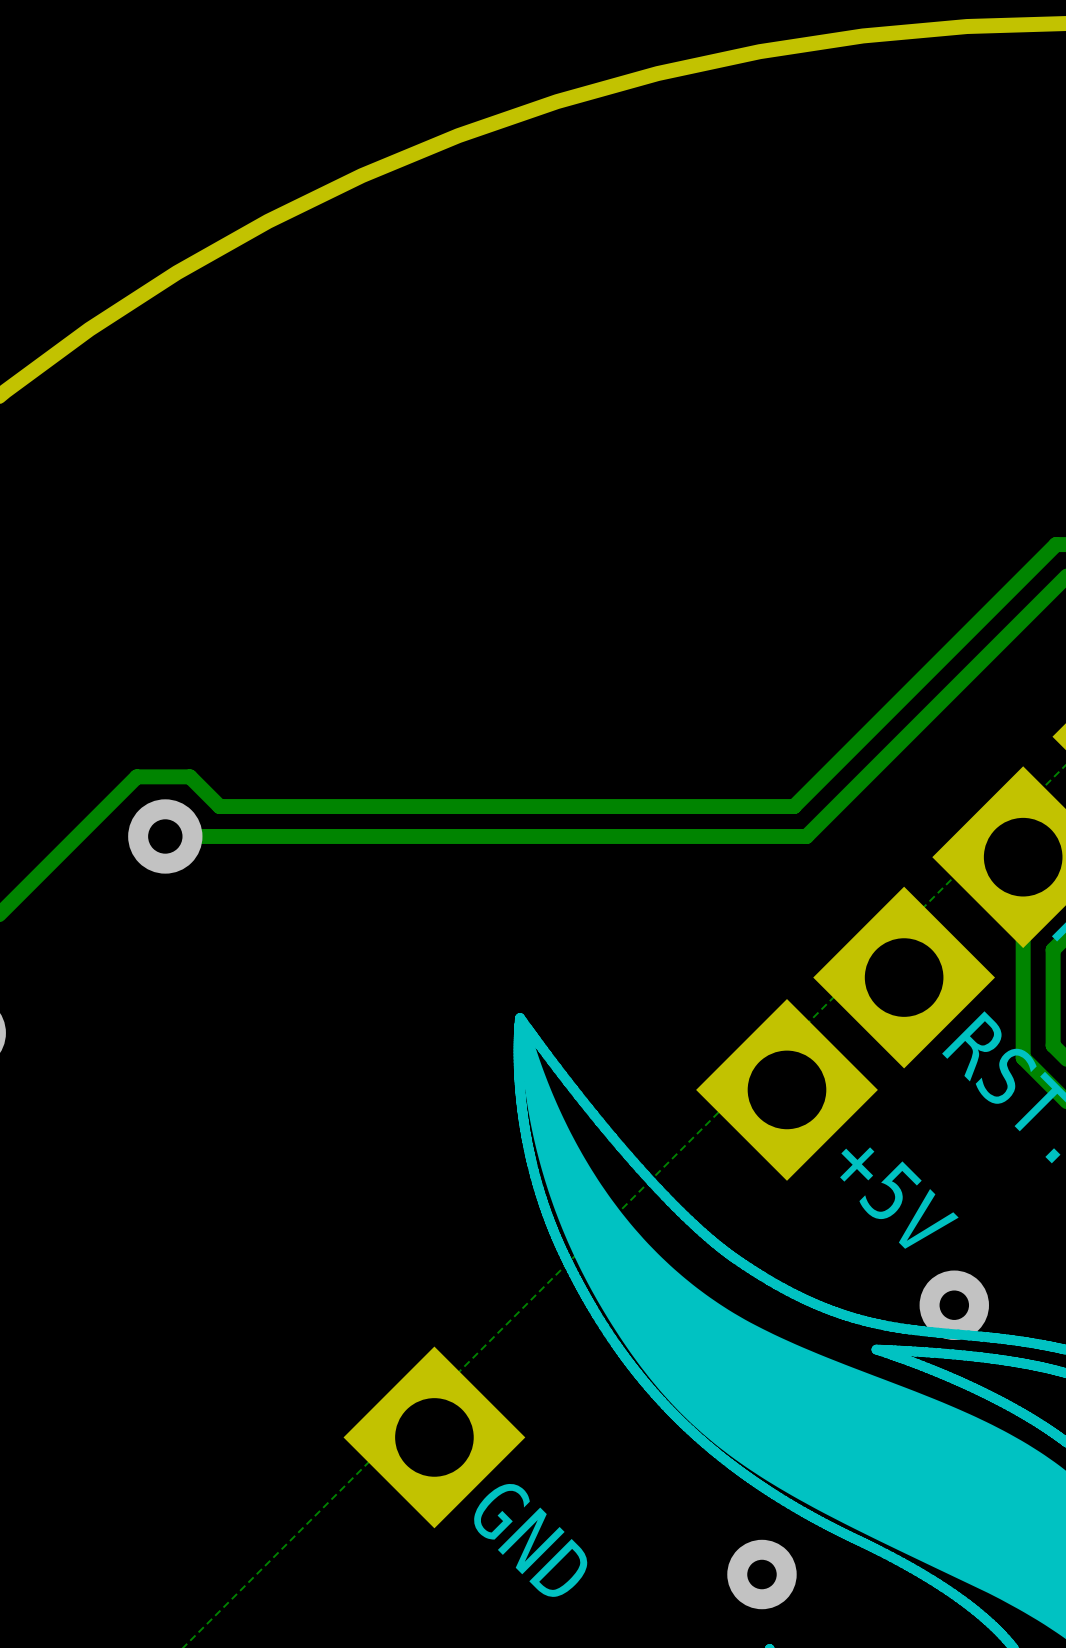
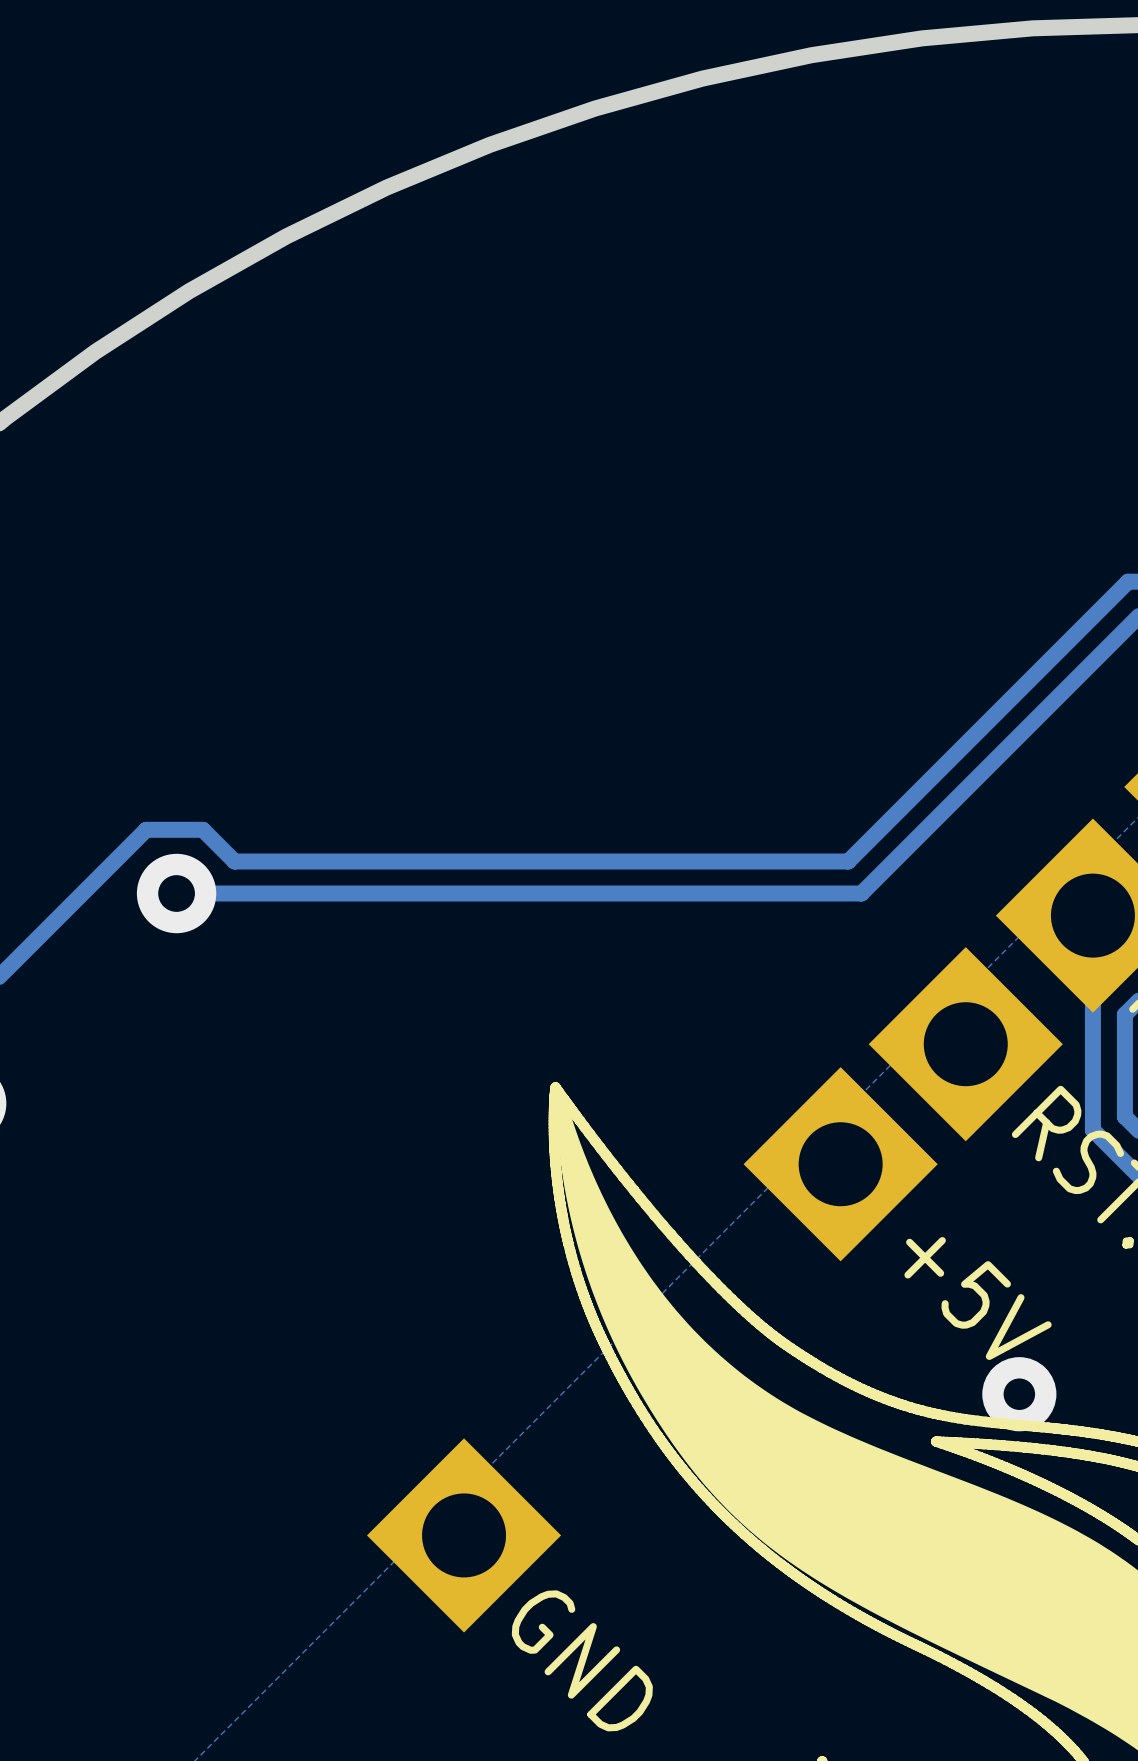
via: (761, 1574) -> none

